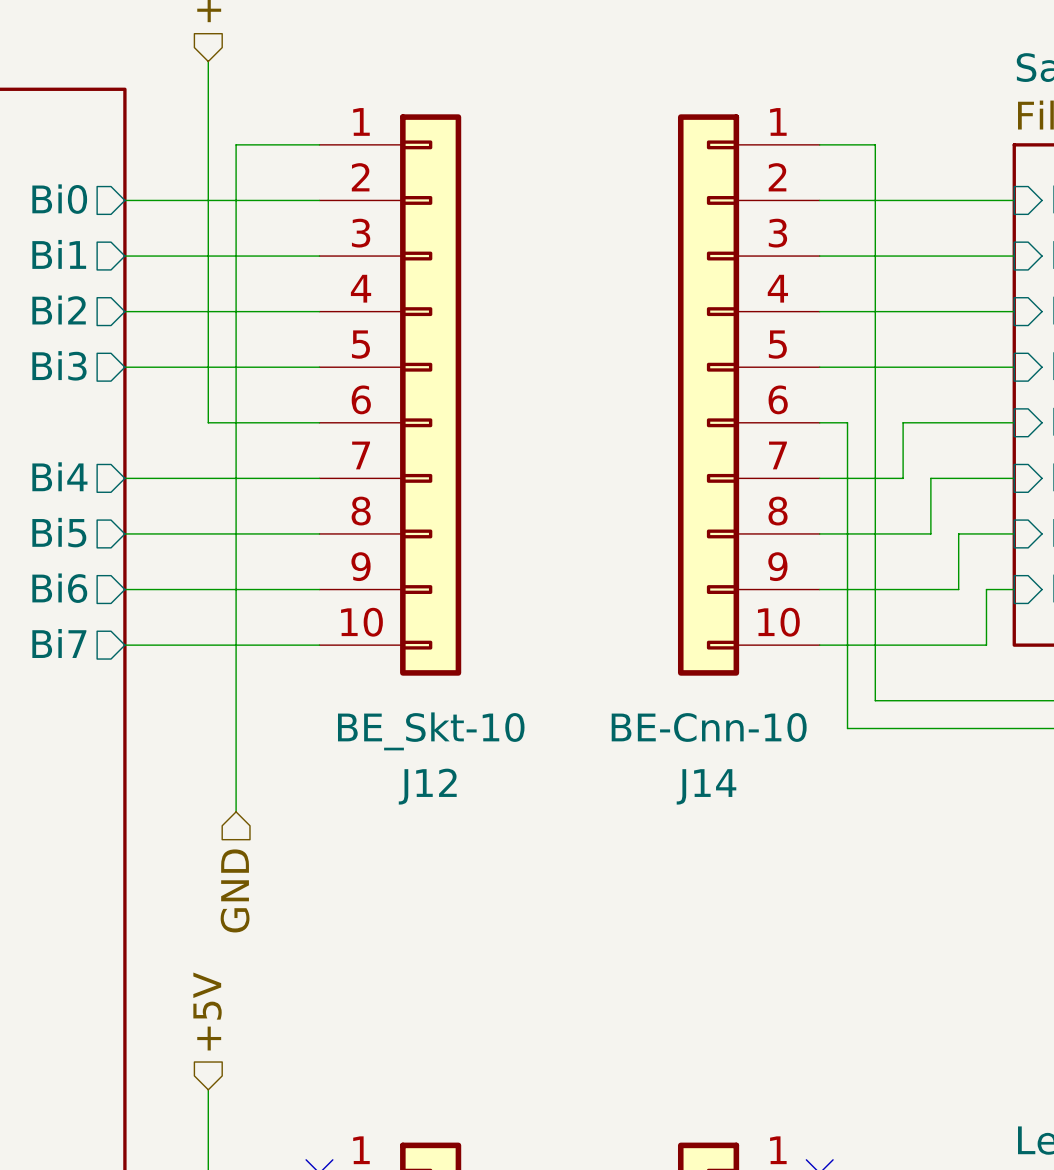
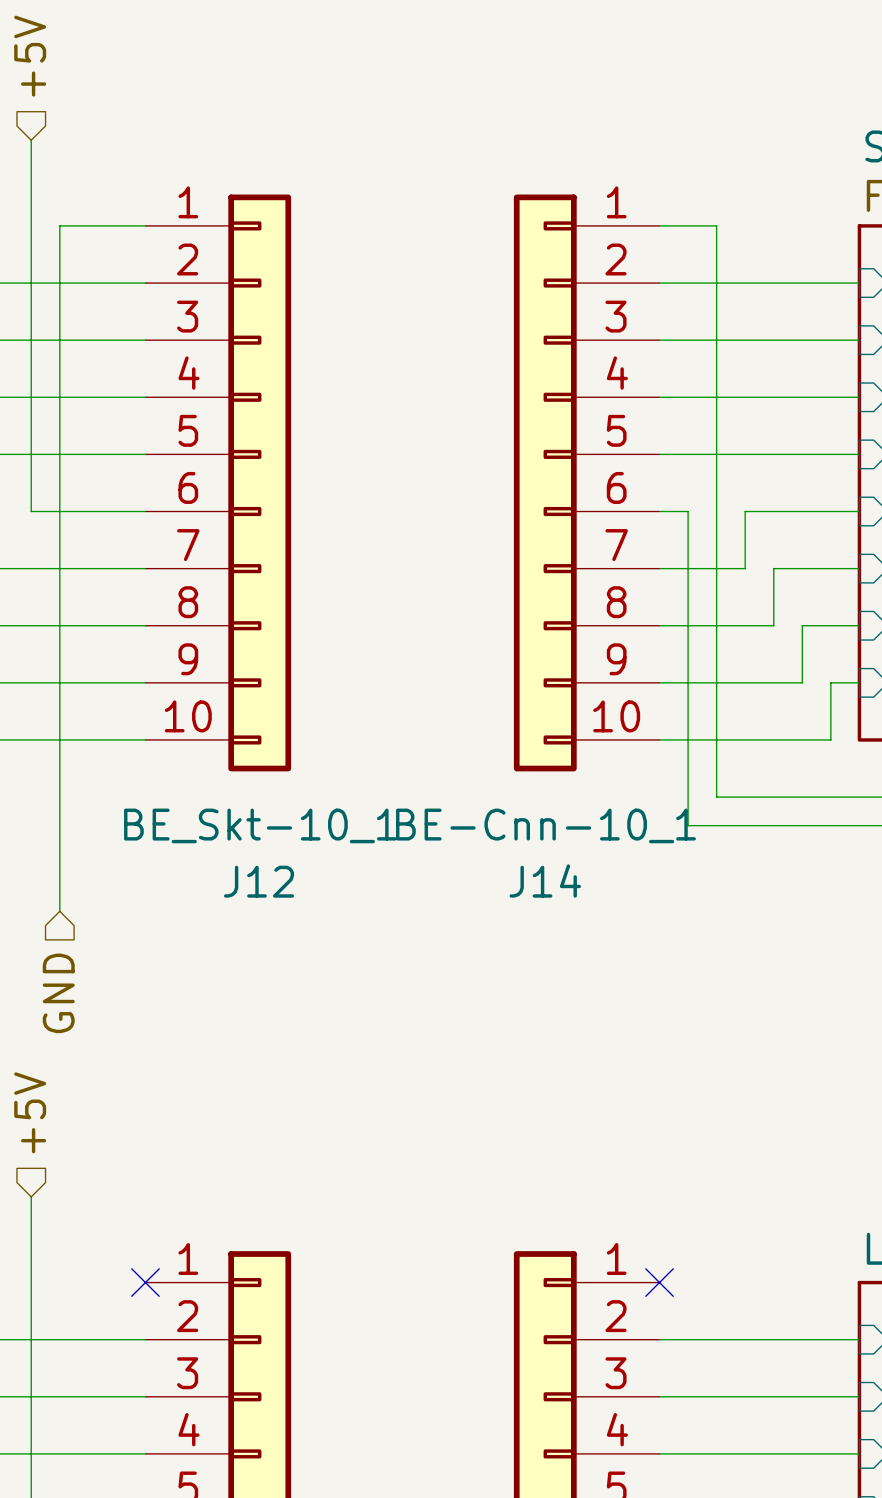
J14 value: BE-Cnn-10 (709, 727) -> BE-Cnn-10_1 (545, 825)
J12 value: BE_Skt-10 (431, 731) -> BE_Skt-10_1 (260, 825)

